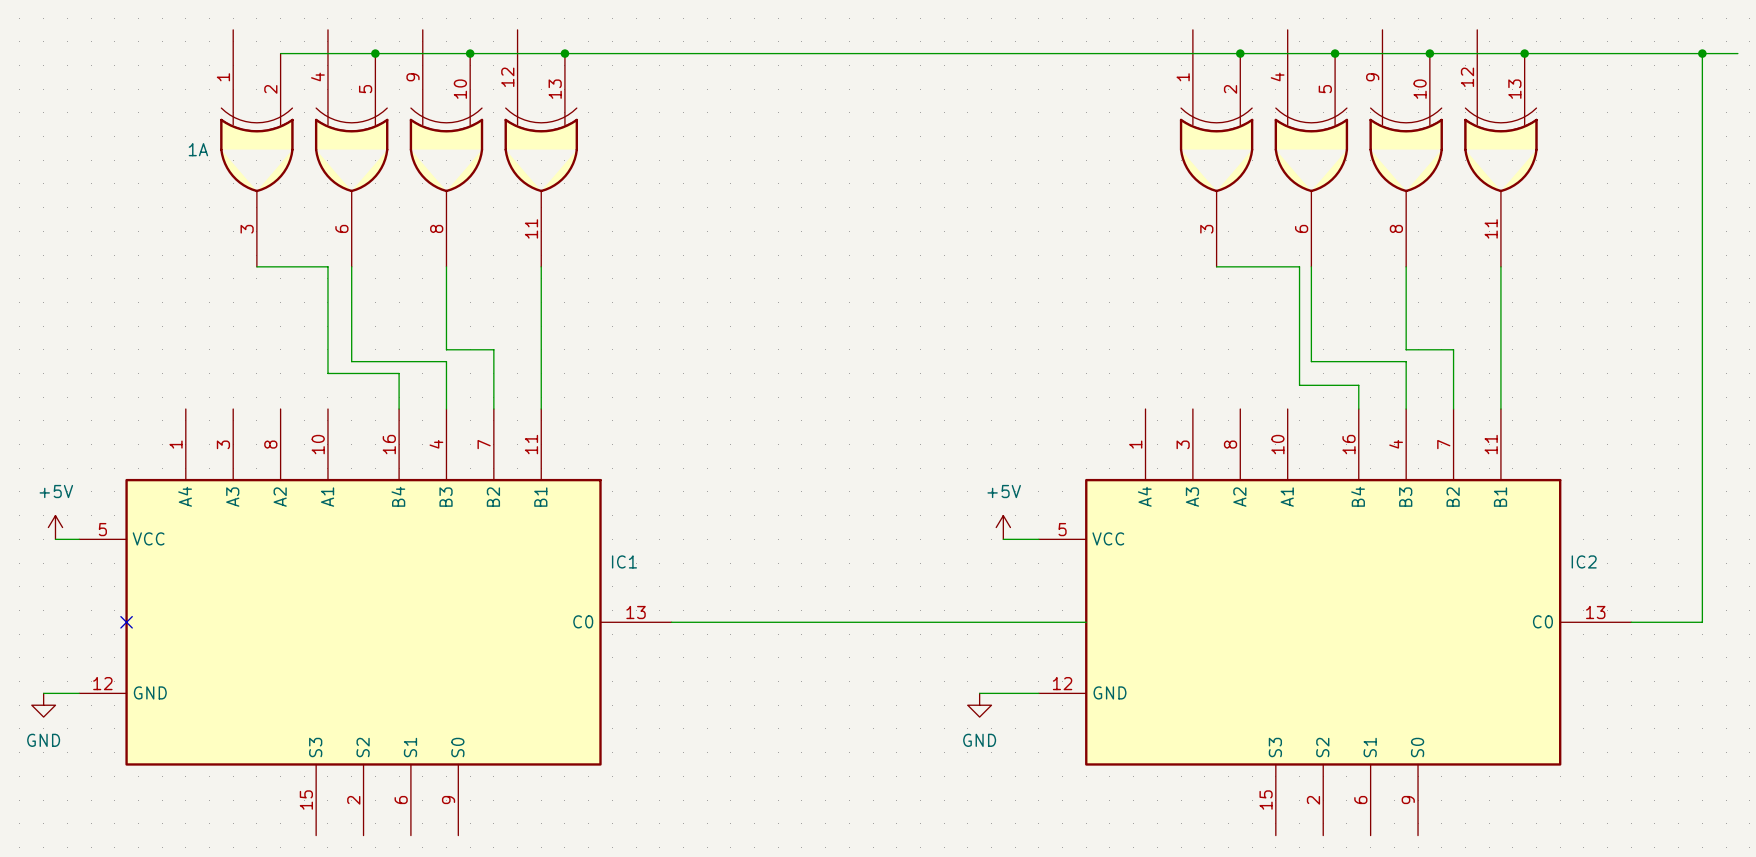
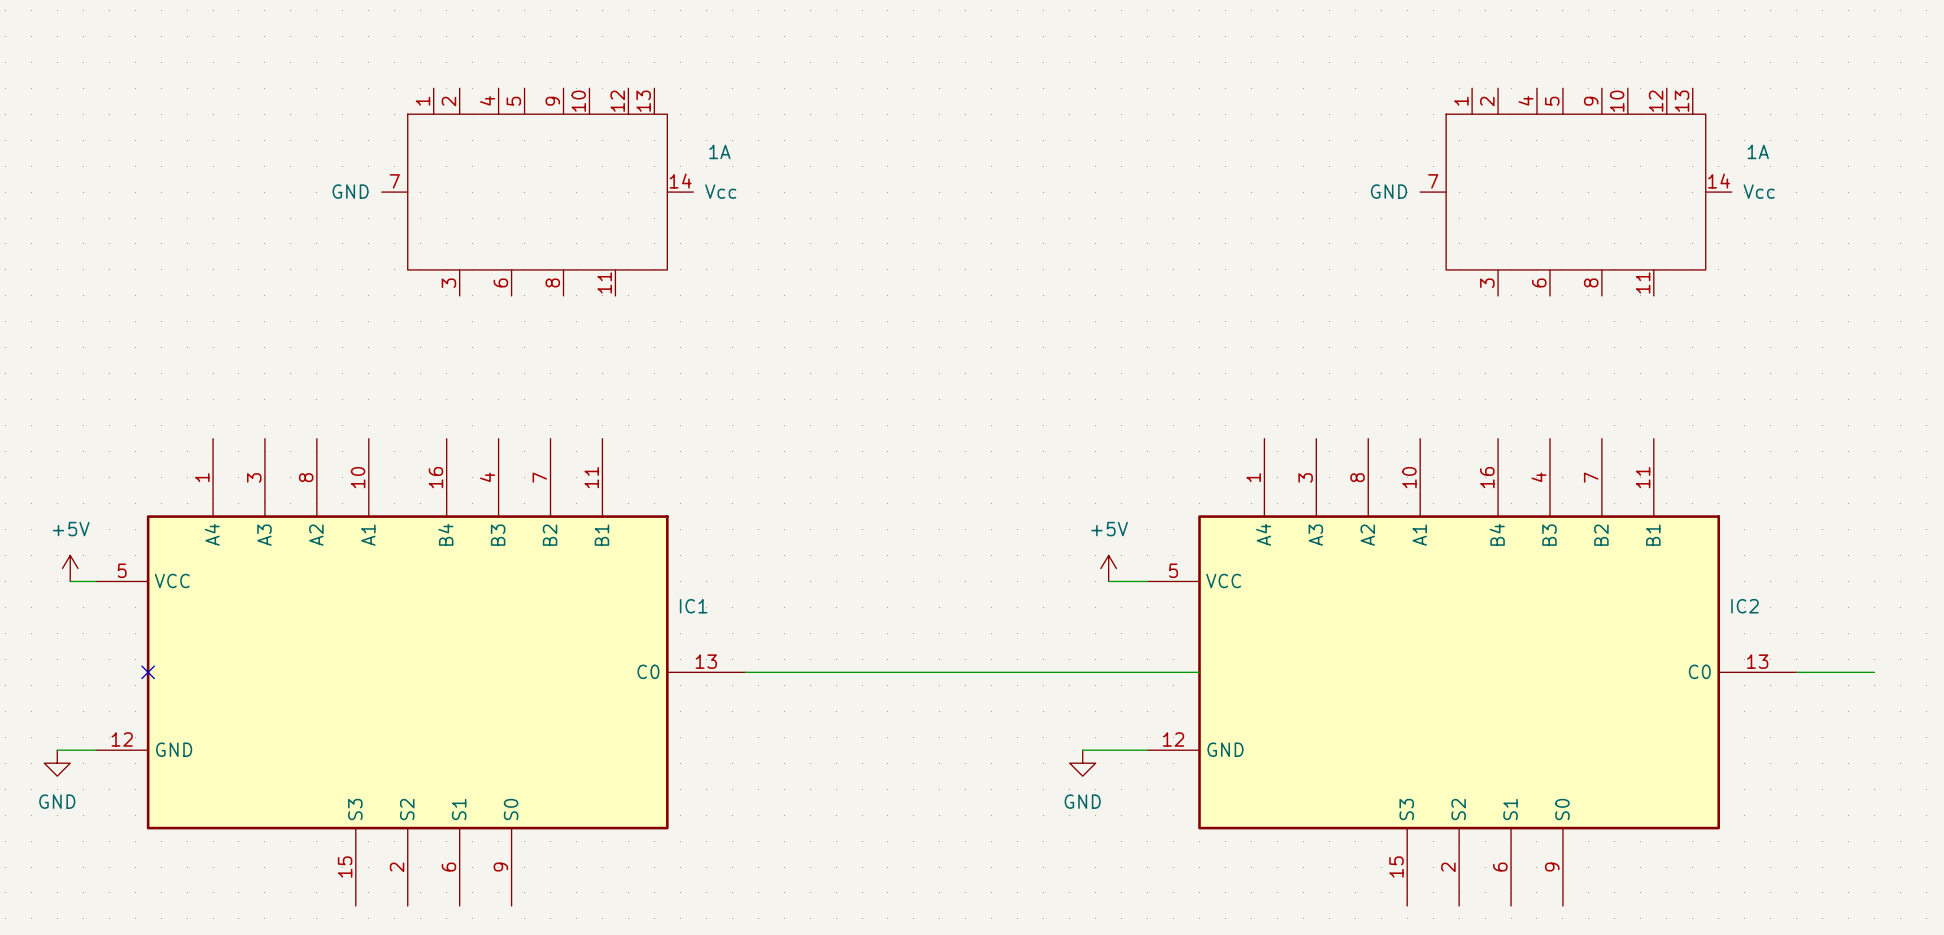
wire: (280, 53) (1737, 53) -> none
junction: (375, 53) -> none
junction: (470, 53) -> none
junction: (564, 53) -> none
junction: (1240, 53) -> none
junction: (1335, 53) -> none
junction: (1429, 53) -> none
junction: (1524, 53) -> none
wire: (1702, 53) (1702, 622) -> none
junction: (1702, 53) -> none
1A: (399, 148) -> none
part: (1358, 148) -> none
1A: none -> (537, 192)
1A: none -> (1575, 192)
wire: (256, 266) (327, 266) (327, 373) (399, 373) (399, 409) -> none
wire: (351, 266) (351, 361) (446, 361) (446, 409) -> none
wire: (446, 266) (446, 349) (493, 349) (493, 409) -> none
wire: (541, 266) (541, 409) -> none
wire: (1216, 266) (1299, 266) (1299, 385) (1358, 385) (1358, 409) -> none
wire: (1311, 266) (1311, 361) (1406, 361) (1406, 409) -> none
wire: (1406, 266) (1406, 349) (1453, 349) (1453, 409) -> none
wire: (1500, 266) (1500, 409) -> none

